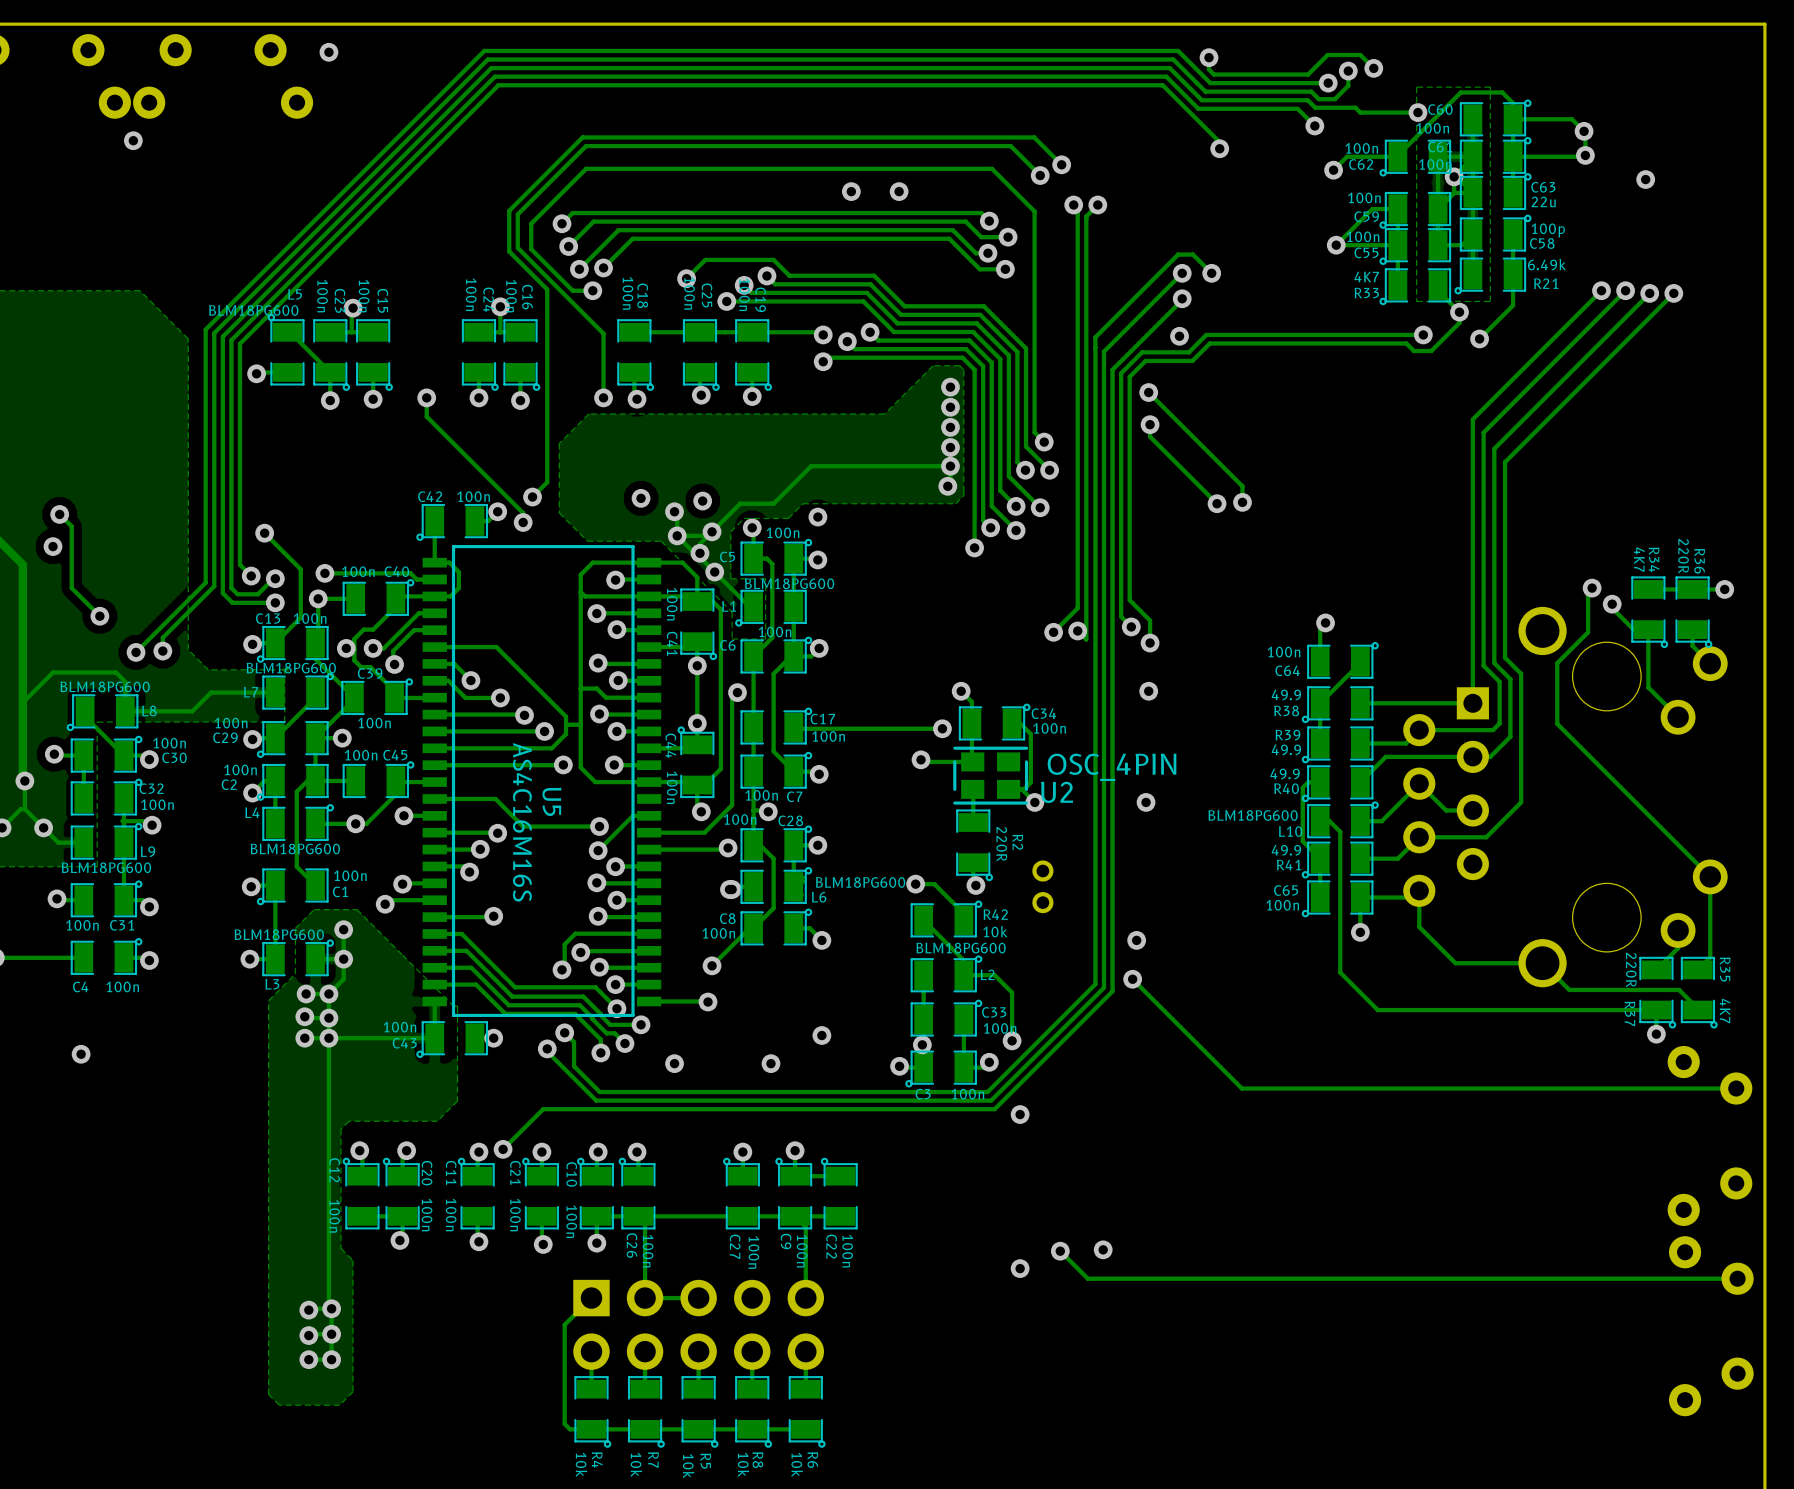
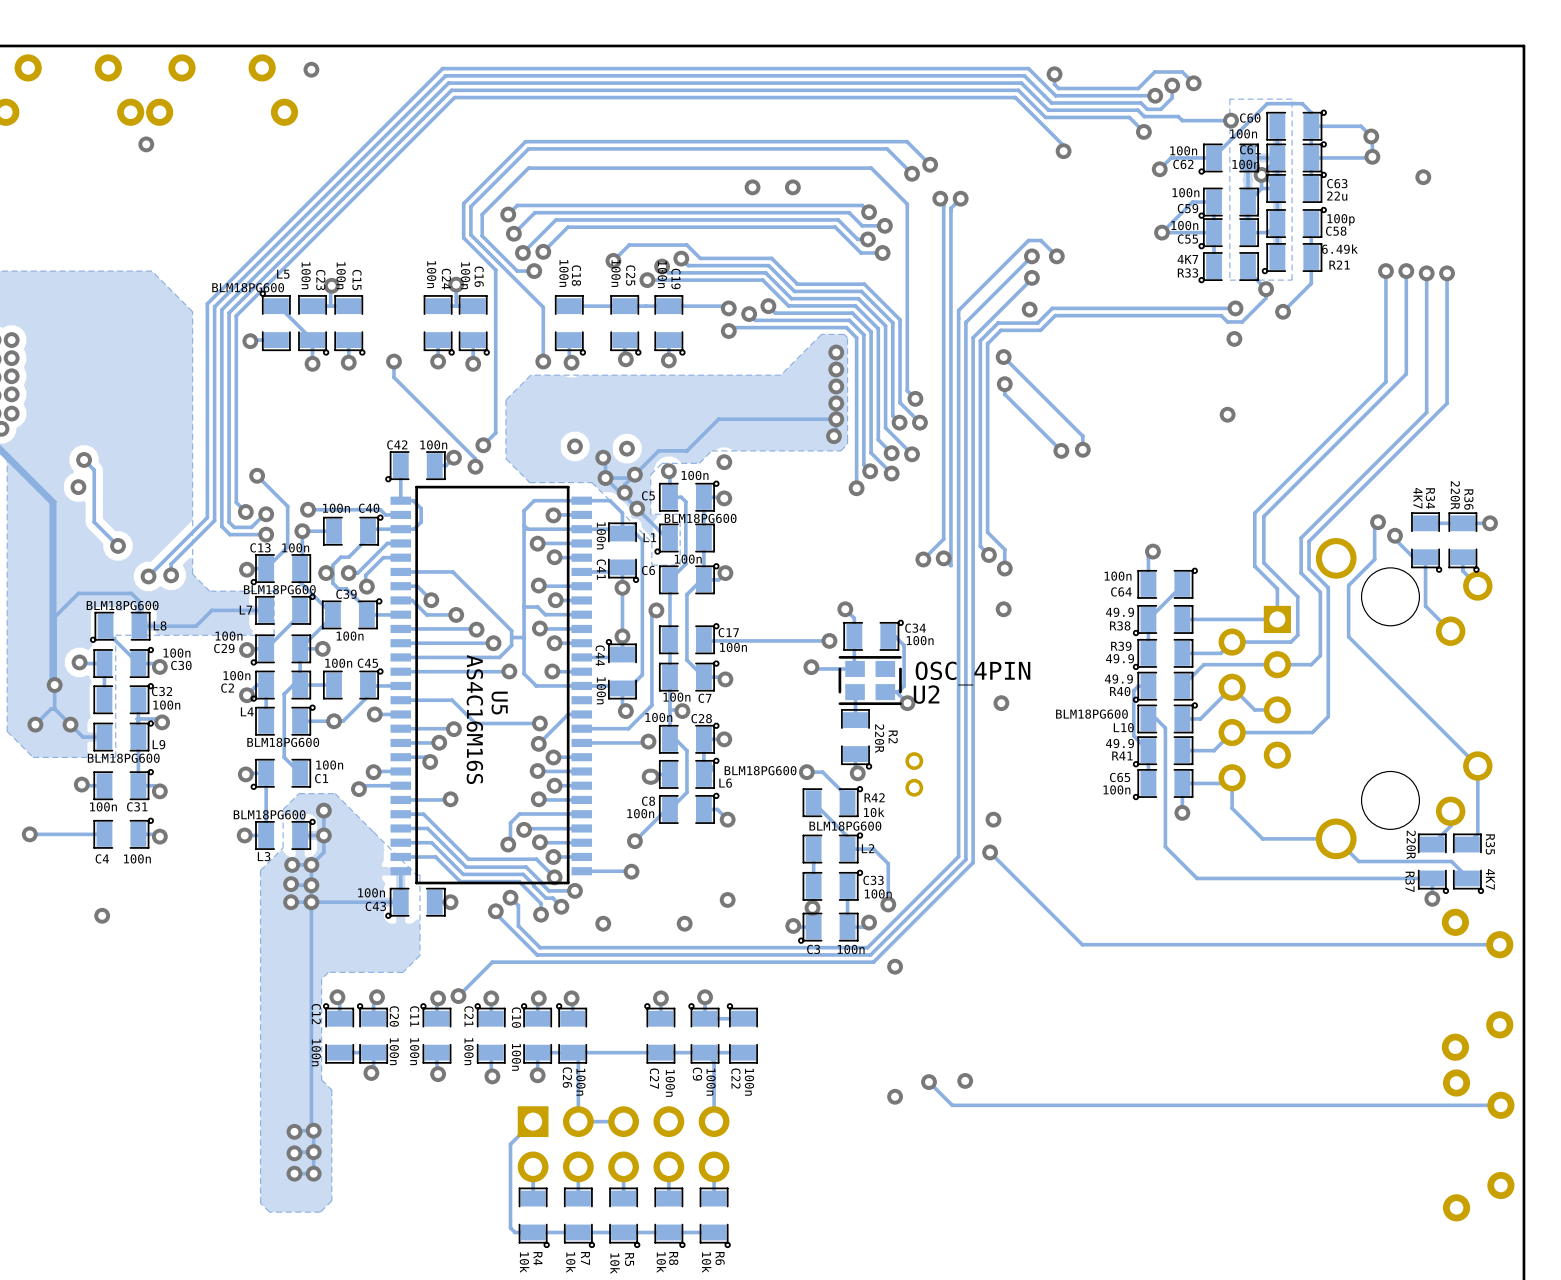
track: (1601, 290) (1472, 419) (1472, 667) -> (1385, 271) (1385, 381) (1254, 513) (1254, 566) (1277, 588)
track: (1625, 290) (1483, 432) (1483, 665) (1499, 681) (1499, 723) (1492, 730) (1488, 730) -> (1406, 271) (1406, 374) (1263, 516) (1263, 562) (1297, 596) (1297, 635) (1290, 642)
track: (1649, 293) (1494, 448) (1494, 663) (1510, 679) (1510, 736) (1490, 756) -> (1426, 273) (1426, 412) (1301, 538) (1301, 573) (1320, 592) (1320, 655) (1311, 664) (1292, 664)
track: (1673, 293) (1505, 462) (1505, 657) (1521, 673) (1521, 802) (1486, 837) -> (1447, 273) (1447, 403) (1309, 541) (1309, 568) (1328, 587) (1328, 716) (1312, 732) (1288, 732)
via: none -> (1234, 338)
via: none -> (1227, 414)

